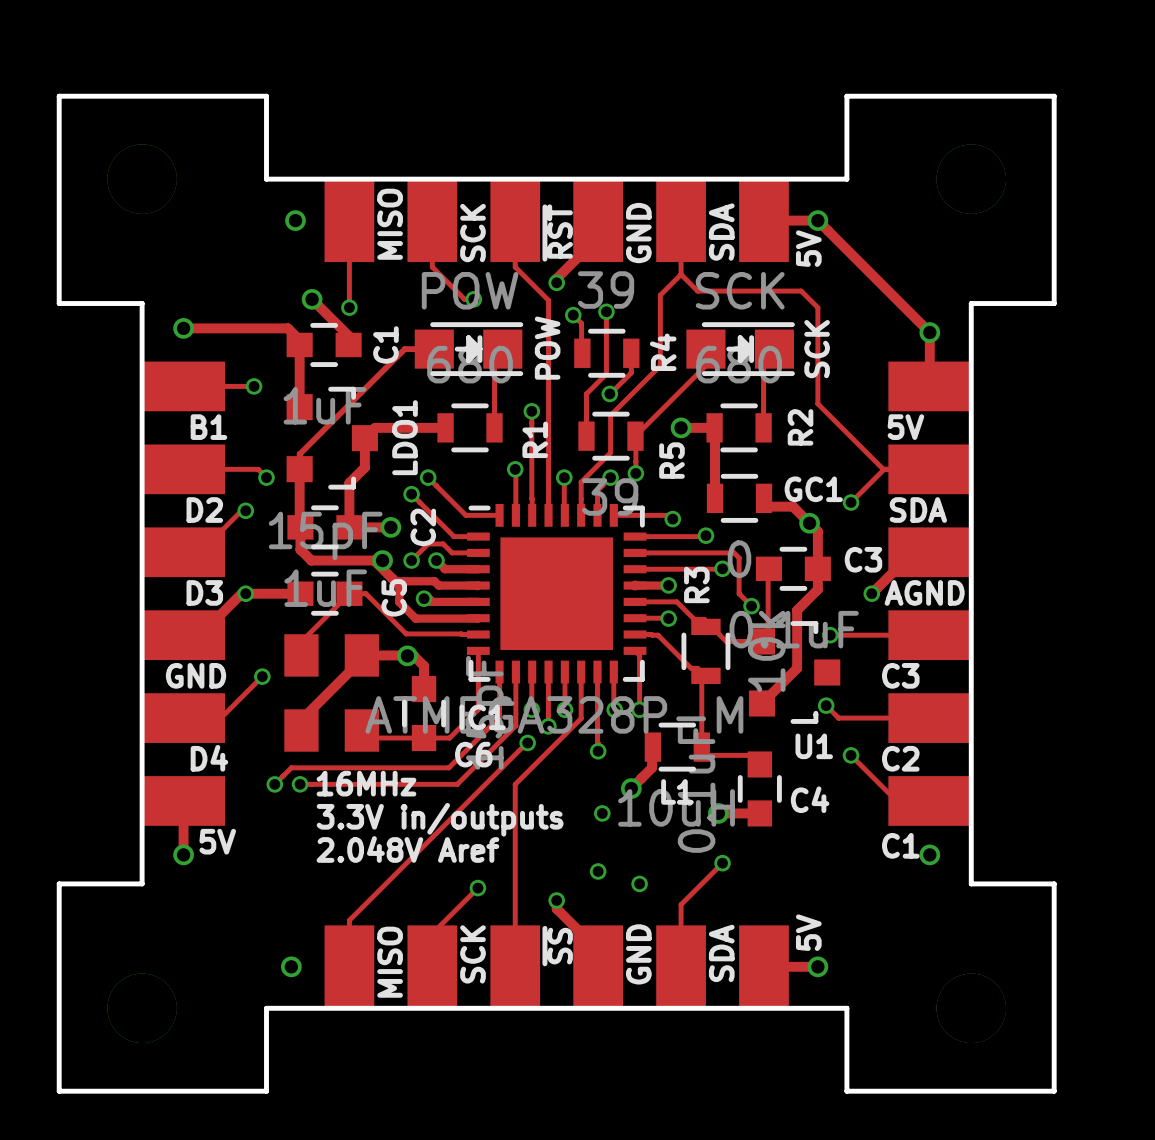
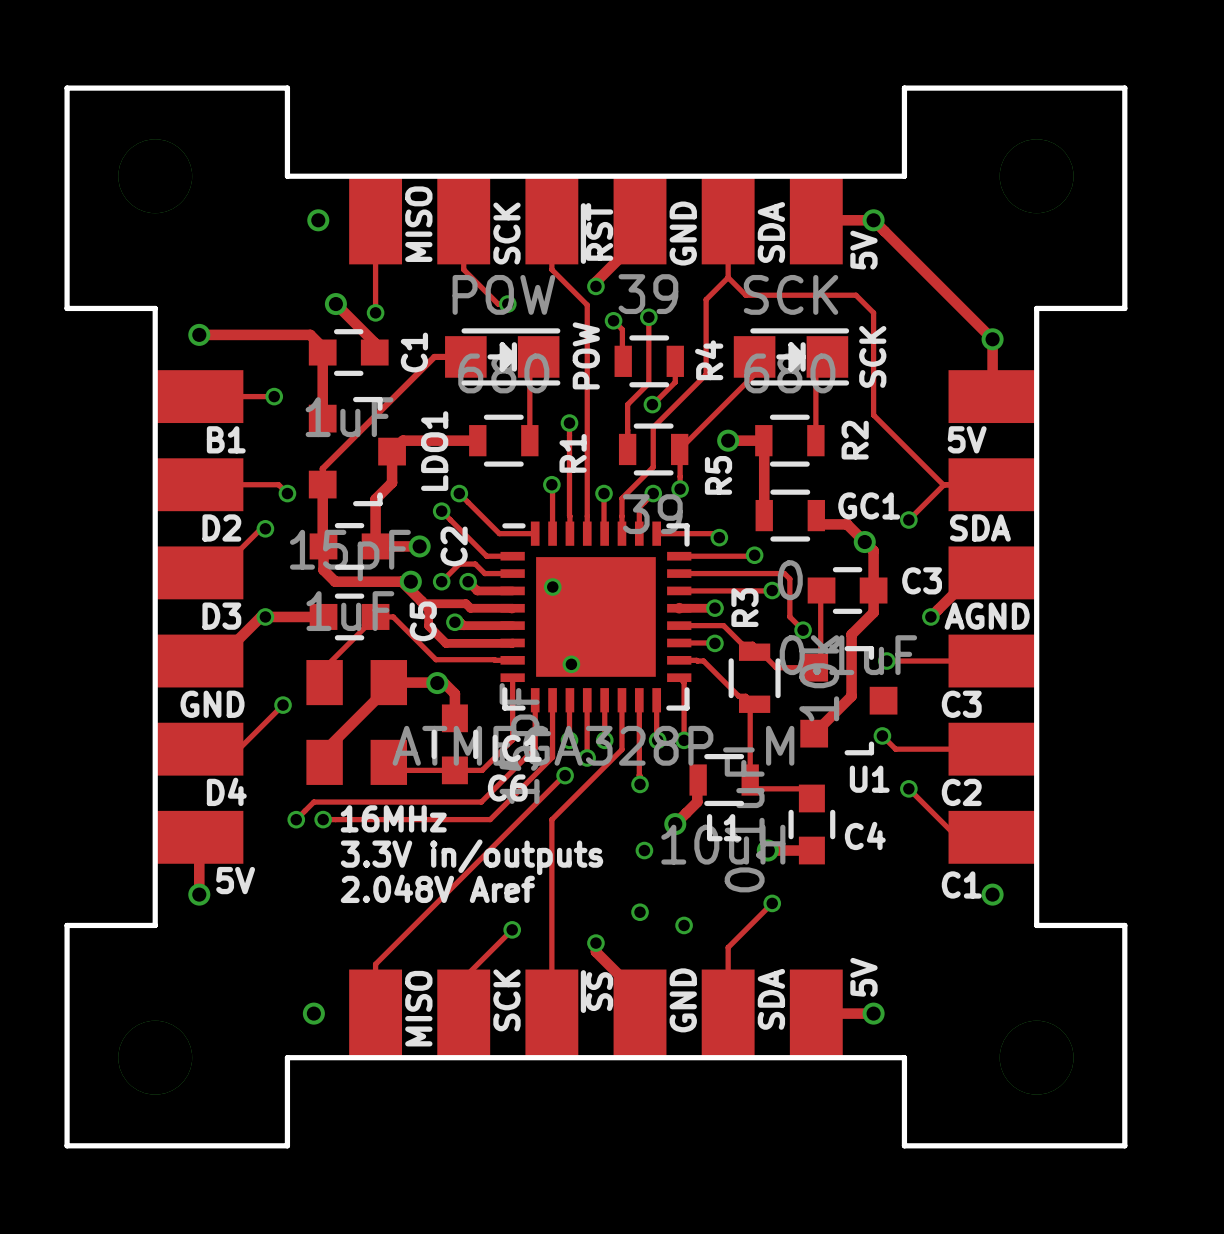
via: none -> (552, 587)
via: none -> (571, 664)

